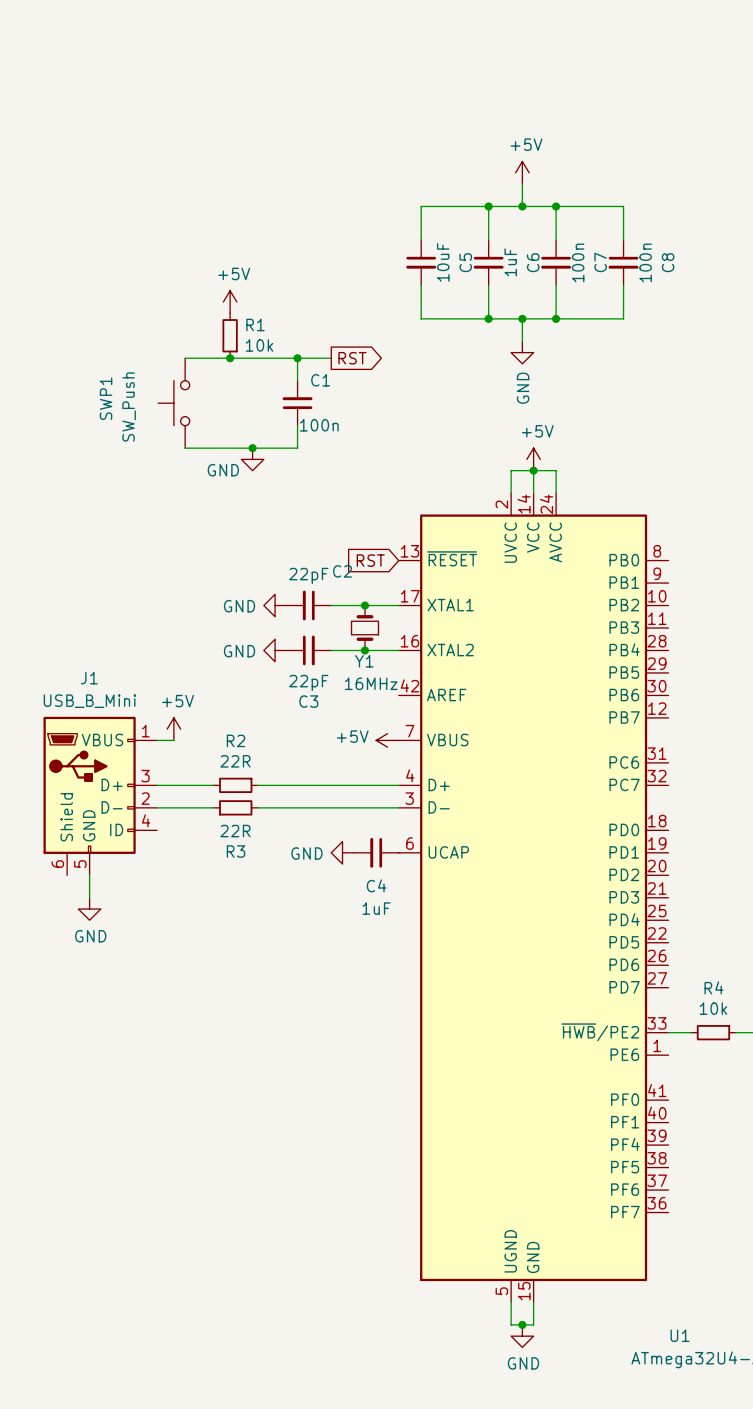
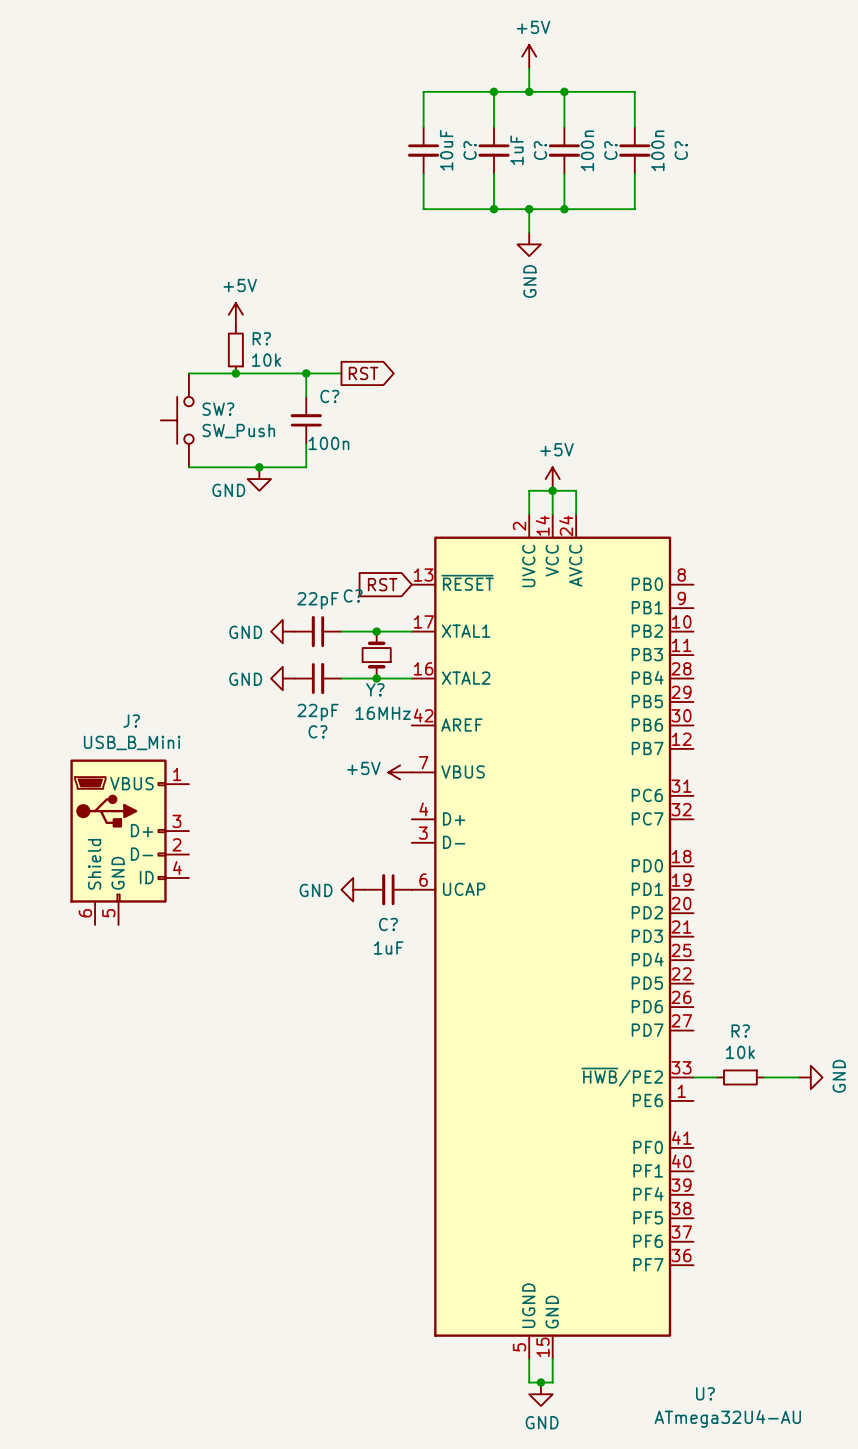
junction: none -> (494, 91)
junction: none -> (529, 91)
junction: none -> (564, 91)
C?: none -> 10uF (423, 150)
C?: none -> 1uF (494, 150)
C?: none -> 100n (564, 150)
C?: none -> 100n (634, 150)
power symbol position: +5V (522, 172) -> +5V (529, 56)
wire: (522, 184) (522, 206) -> (529, 68) (529, 91)
junction: none -> (494, 209)
junction: none -> (529, 209)
junction: none -> (564, 209)
wire: (488, 206) (488, 240) -> (494, 91) (494, 127)
junction: (488, 206) -> none
junction: (522, 206) -> none
wire: (556, 206) (556, 240) -> (564, 91) (564, 127)
junction: (556, 206) -> none
wire: (421, 240) (421, 206) (623, 206) (623, 240) -> (423, 127) (423, 91) (634, 91) (634, 127)
C5: 10uF (421, 262) -> none
C6: 1uF (488, 262) -> none
C7: 100n (556, 262) -> none
C8: 100n (623, 262) -> none
wire: (421, 285) (421, 318) (623, 318) (623, 285) -> (423, 173) (423, 209) (634, 209) (634, 173)
wire: (488, 285) (488, 318) -> (494, 173) (494, 209)
wire: (556, 285) (556, 318) -> (564, 173) (564, 209)
junction: (488, 318) -> none
wire: (522, 318) (522, 341) -> (529, 209) (529, 232)
junction: (522, 318) -> none
junction: (556, 318) -> none
R1 name: R1 (255, 324) -> R? (261, 338)
power symbol position: GND (522, 352) -> GND (529, 244)
C1 name: C1 (320, 380) -> C? (329, 396)
SWP1 name: SWP1 (106, 398) -> SW? (218, 409)
SWP1 value rotation: 0° (129, 407) -> 90° clockwise (238, 431)
SWP1 value position: SW_Push (129, 407) -> SW_Push (238, 431)
C2 name: C2 (342, 571) -> C? (353, 595)
Y1 name: Y1 (364, 661) -> Y? (375, 689)
C3 name: C3 (308, 701) -> C? (318, 731)
power symbol: +5V (173, 729) -> none
wire: (157, 785) (213, 785) -> none
R2: 22R (235, 785) -> none
wire: (258, 785) (398, 785) -> none
J1: USB_B_Mini (100, 796) -> none
J?: none -> USB_B_Mini (129, 842)
wire: (157, 807) (213, 807) -> none
R3: 22R (235, 807) -> none
wire: (258, 807) (398, 807) -> none
wire: (89, 875) (89, 897) -> none
C4 name: C4 (376, 885) -> C? (388, 924)
power symbol: GND (89, 909) -> none
R4 name: R4 (713, 987) -> R? (740, 1031)
U1 name: U1 (680, 1335) -> U? (705, 1393)

